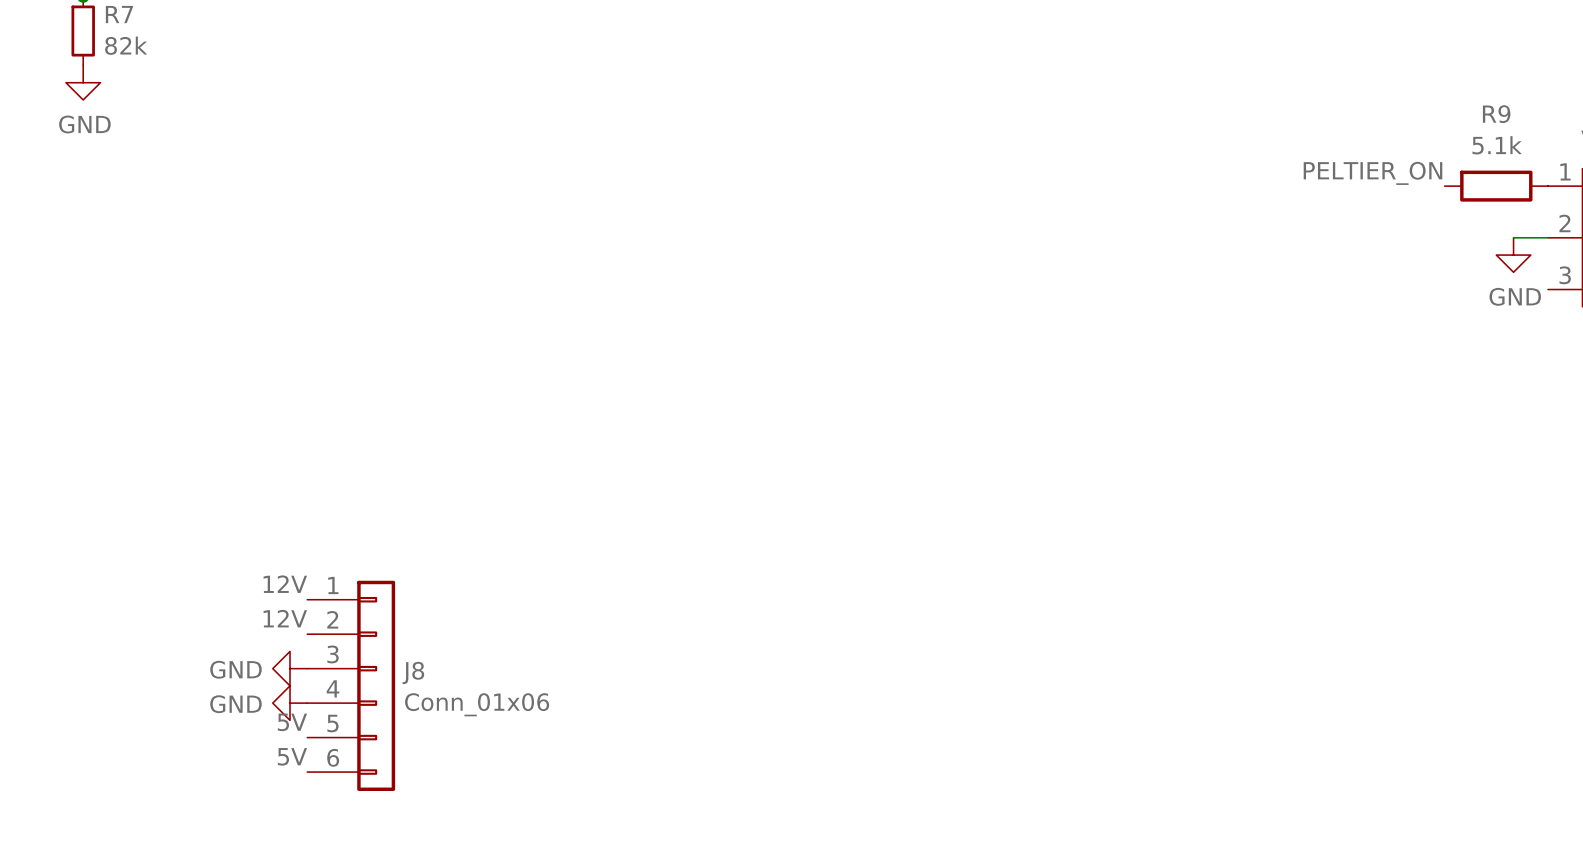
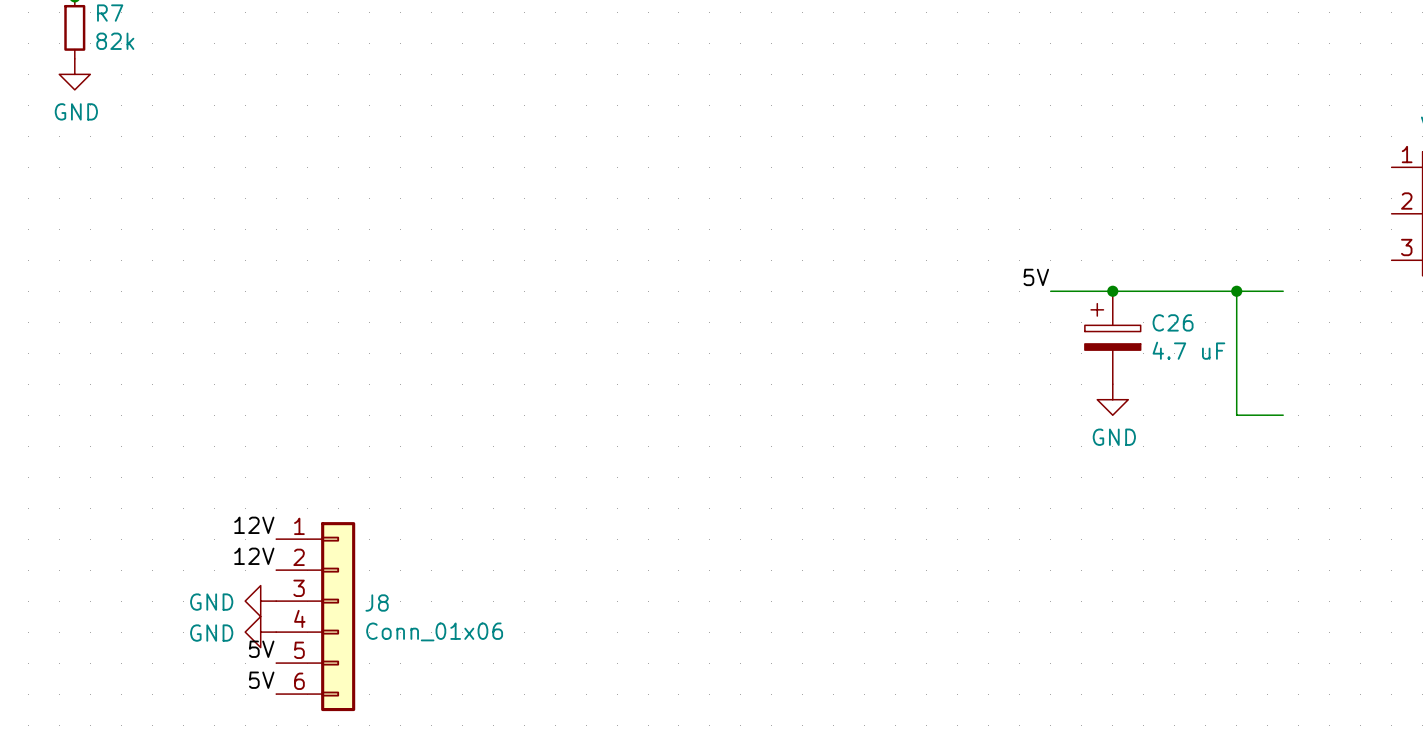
label: PELTIER_ON (1373, 173) -> none
R9: 5.1k (1496, 186) -> none
wire: (1513, 237) (1548, 237) -> none
power symbol: GND (1513, 255) -> none
label: none -> 5V (1036, 277)
wire: none -> (1050, 291) (1283, 291)
junction: none -> (1112, 291)
wire: none -> (1236, 291) (1236, 415) (1283, 415)
junction: none -> (1236, 291)
C26: none -> 4.7 uF (1112, 337)
power symbol: none -> GND (1112, 399)

